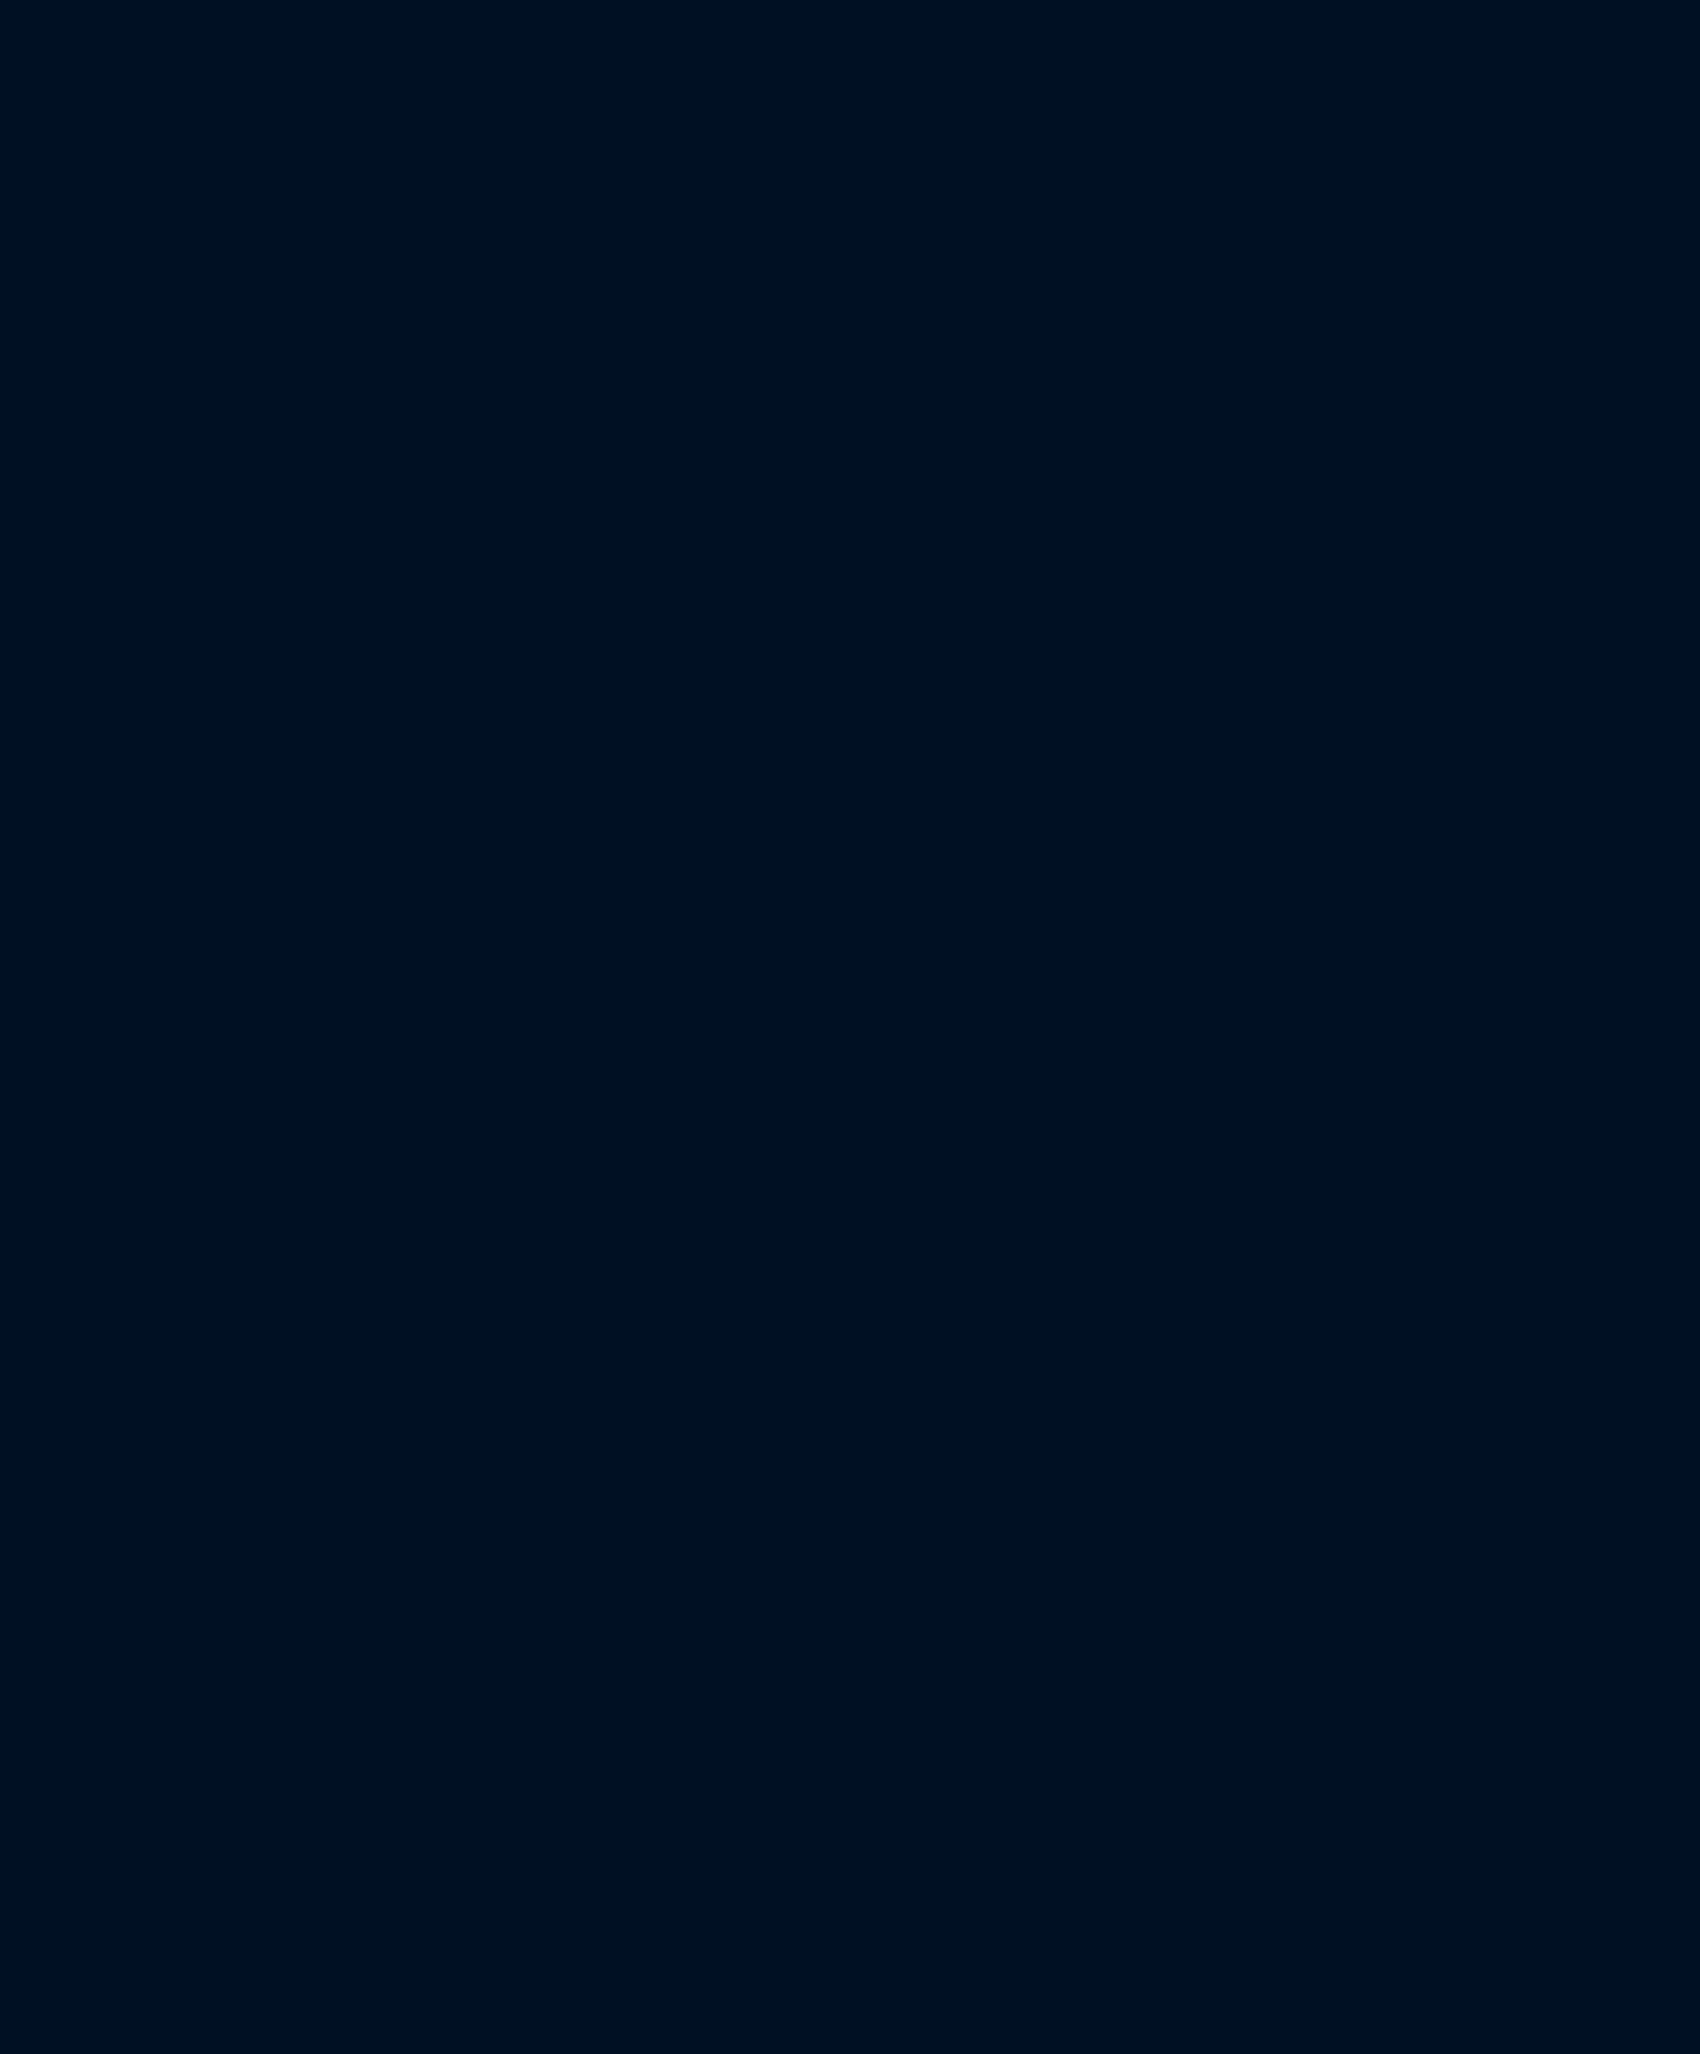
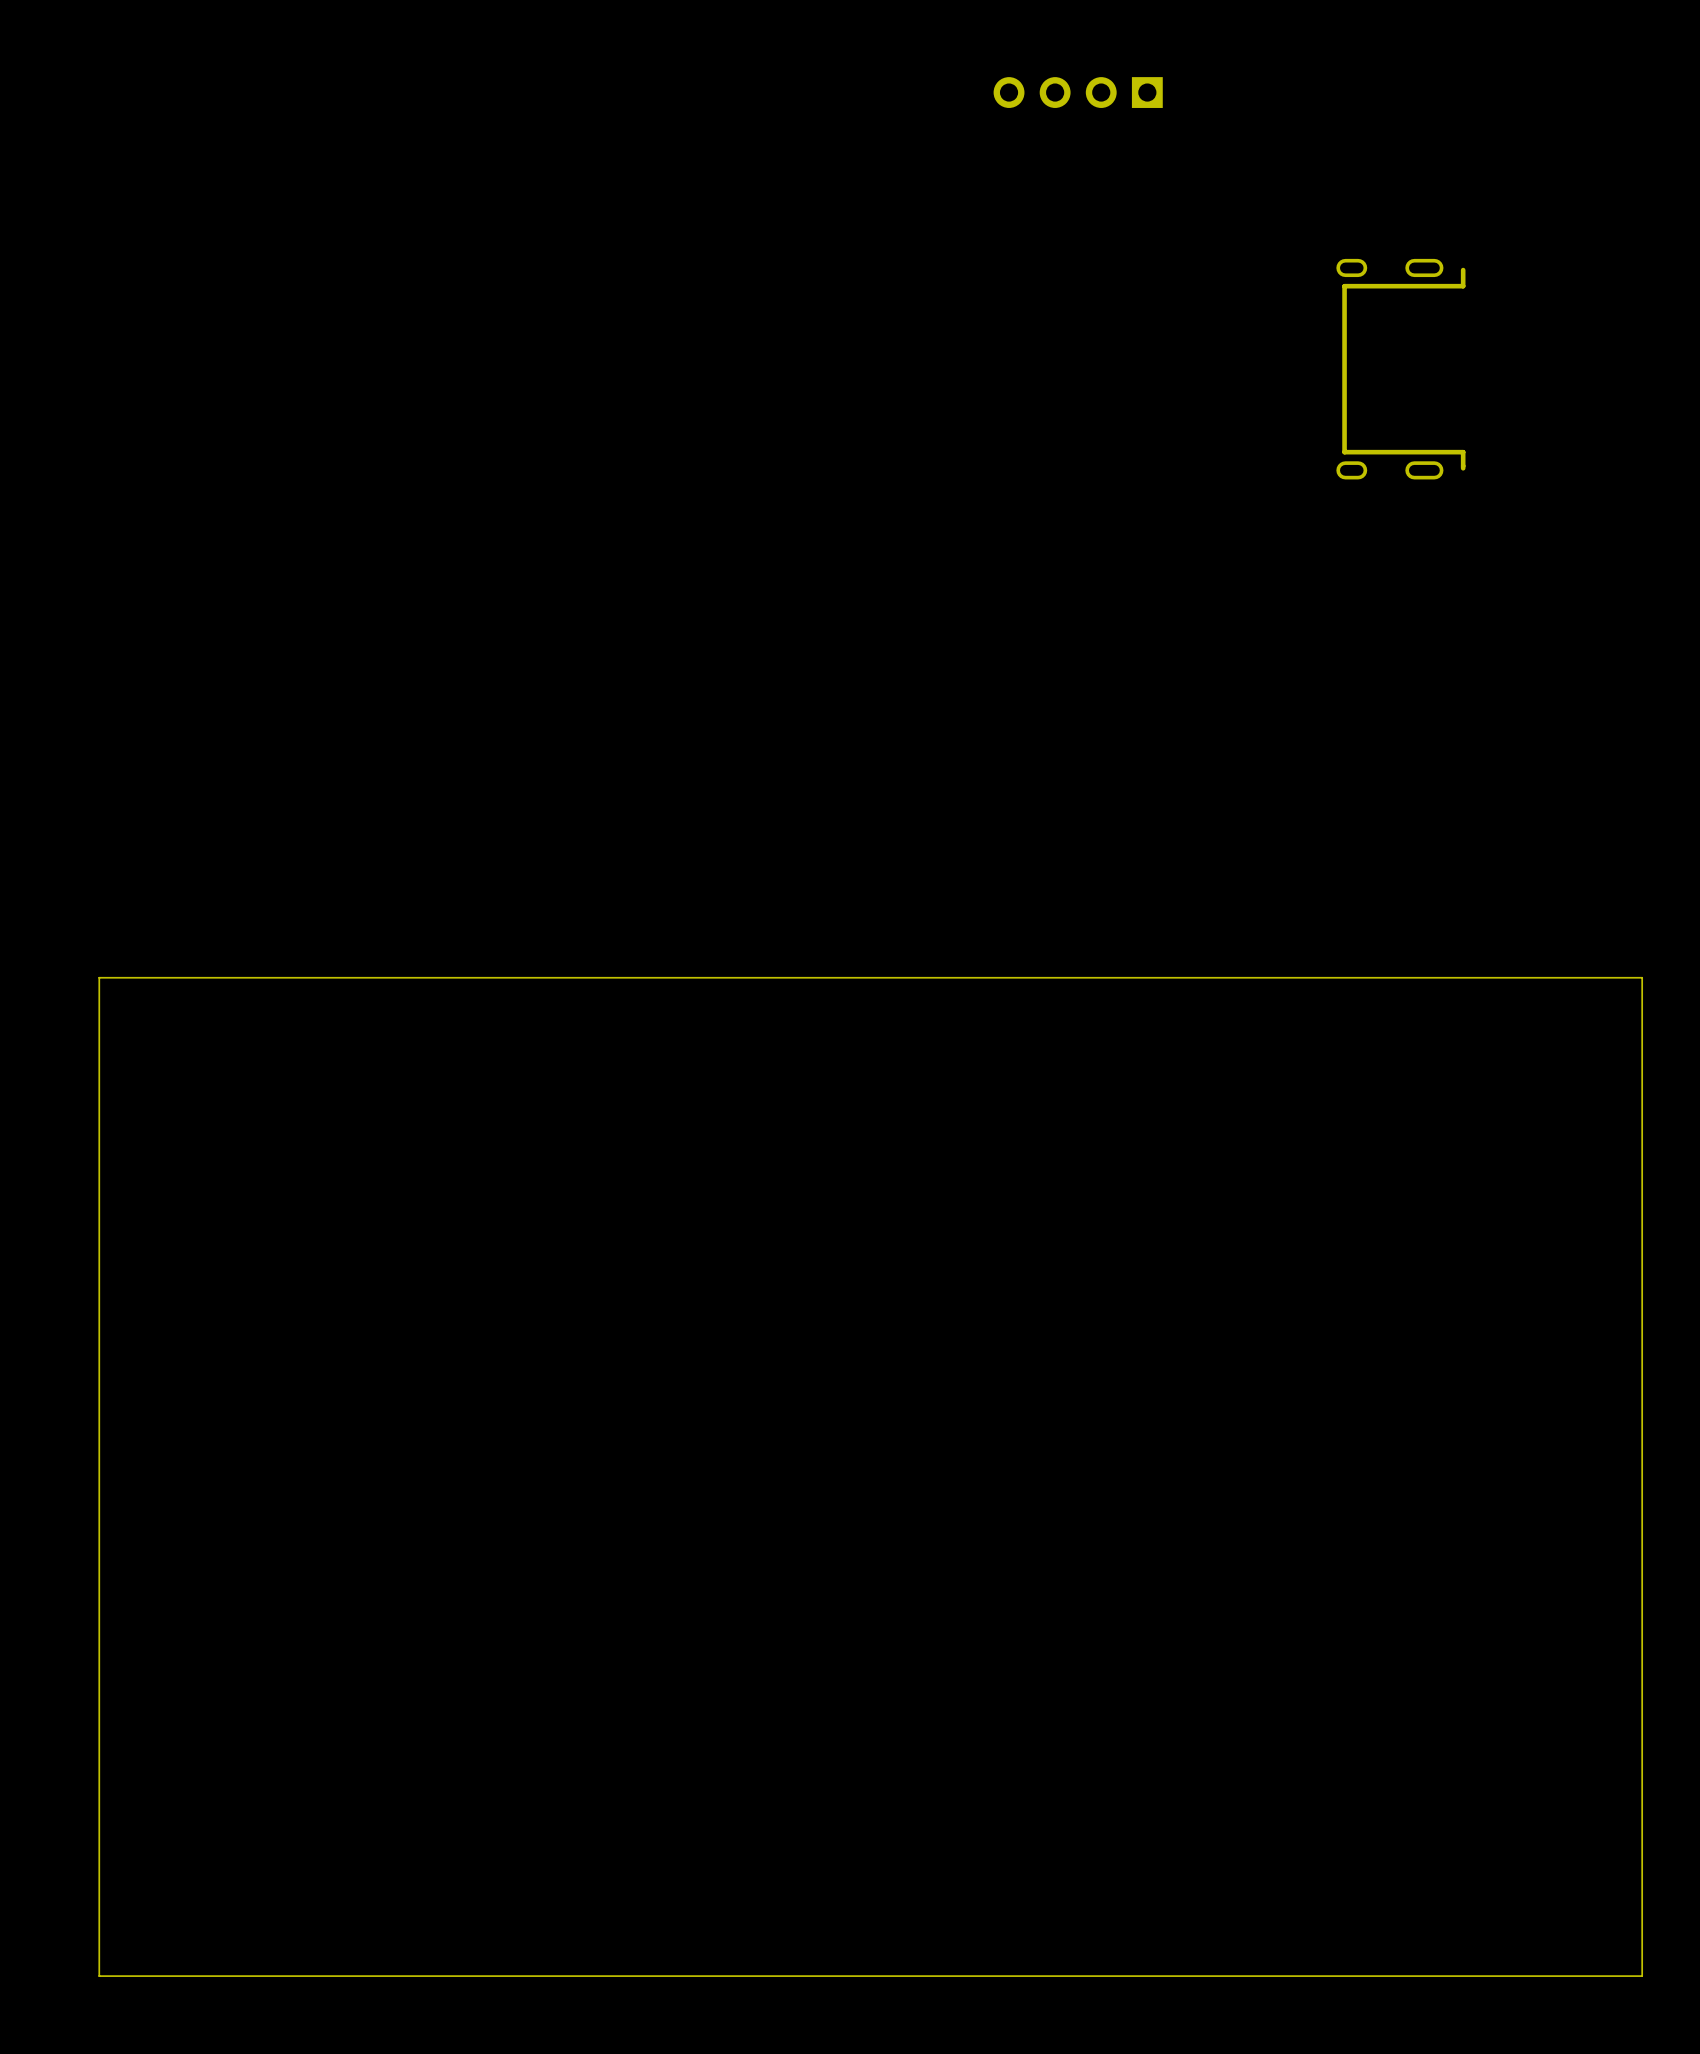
part: none -> (1078, 92)
part: none -> (1400, 369)
board edge: none -> (1642, 977) (99, 977) (99, 1976) (1642, 1976) (1642, 977)

